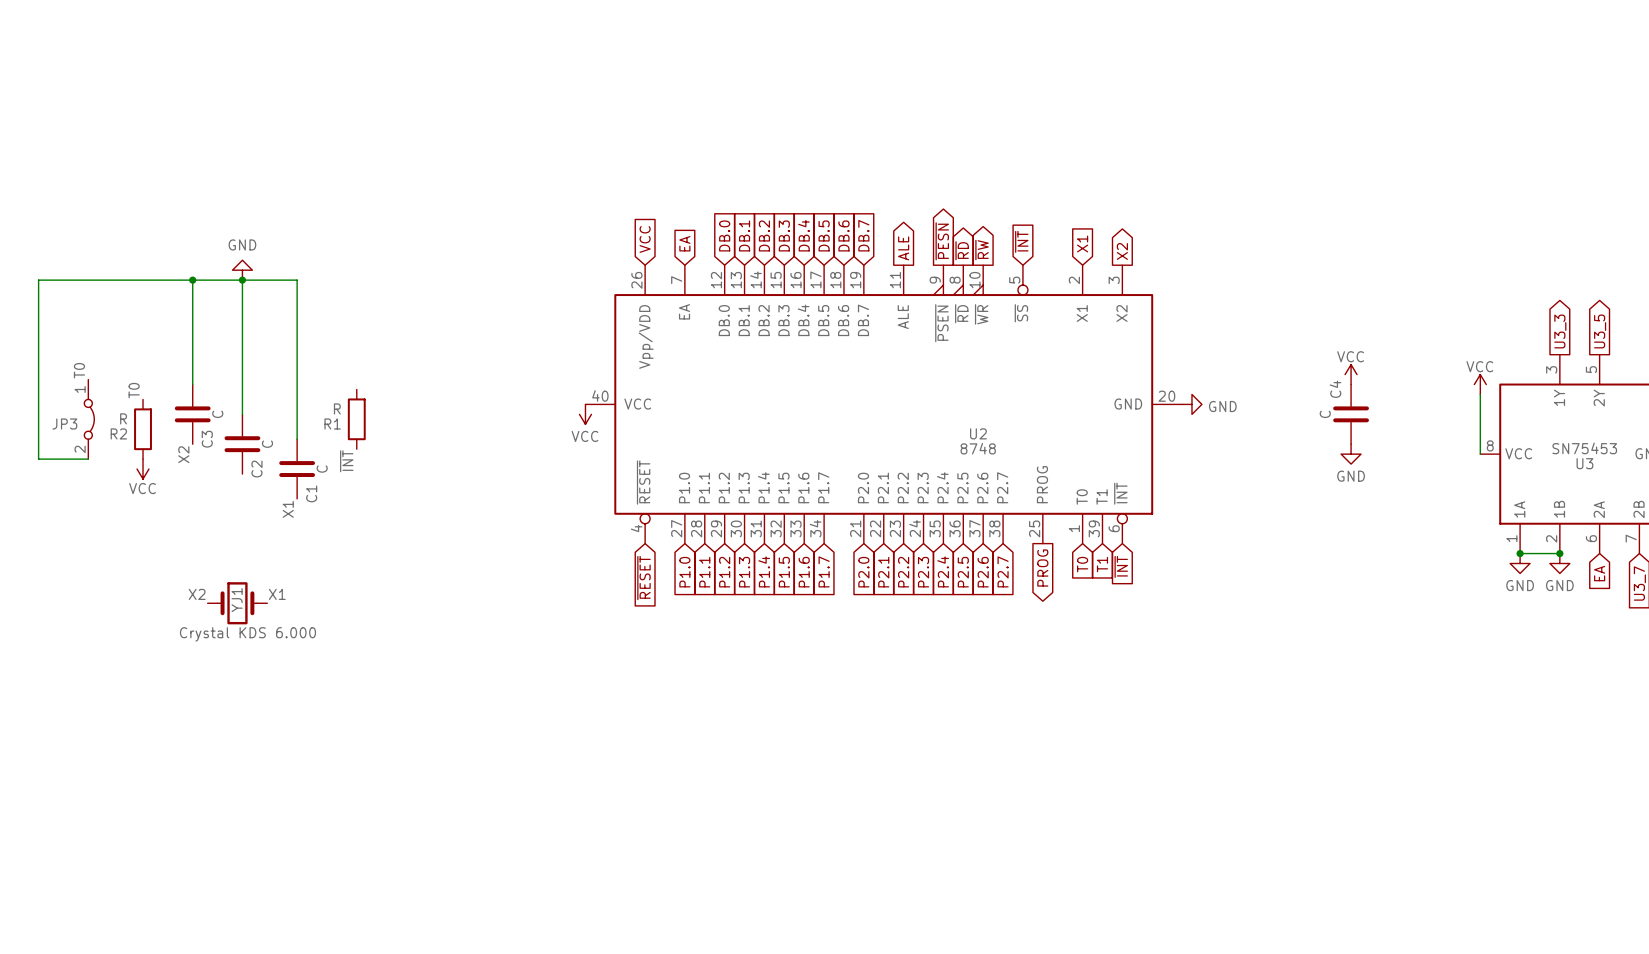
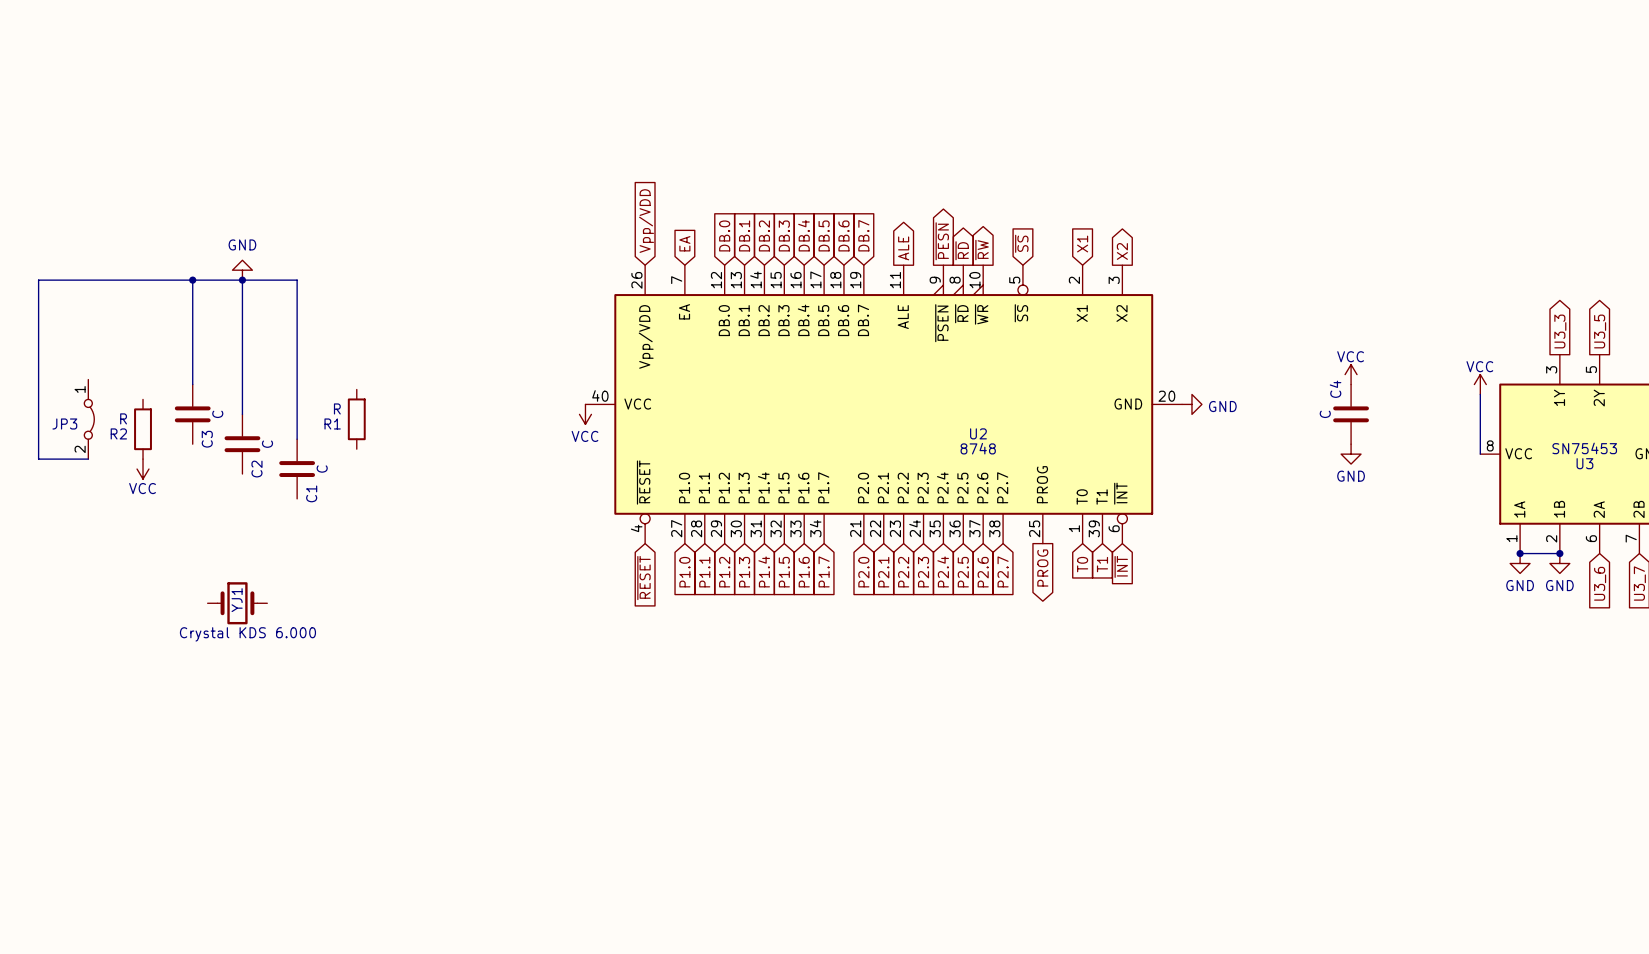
global label: VCC (645, 239) -> Vpp/VDD (646, 221)
global label: ~{INT} (1021, 241) -> ~{SS} (1021, 243)
label: T0 (79, 370) -> none
label: T0 (134, 390) -> none
label: X2 (183, 454) -> none
label: ~{INT} (346, 461) -> none
label: X1 (288, 509) -> none
global label: EA (1599, 573) -> U3_6 (1600, 583)
label: X2 (197, 594) -> none
label: X1 (277, 594) -> none

